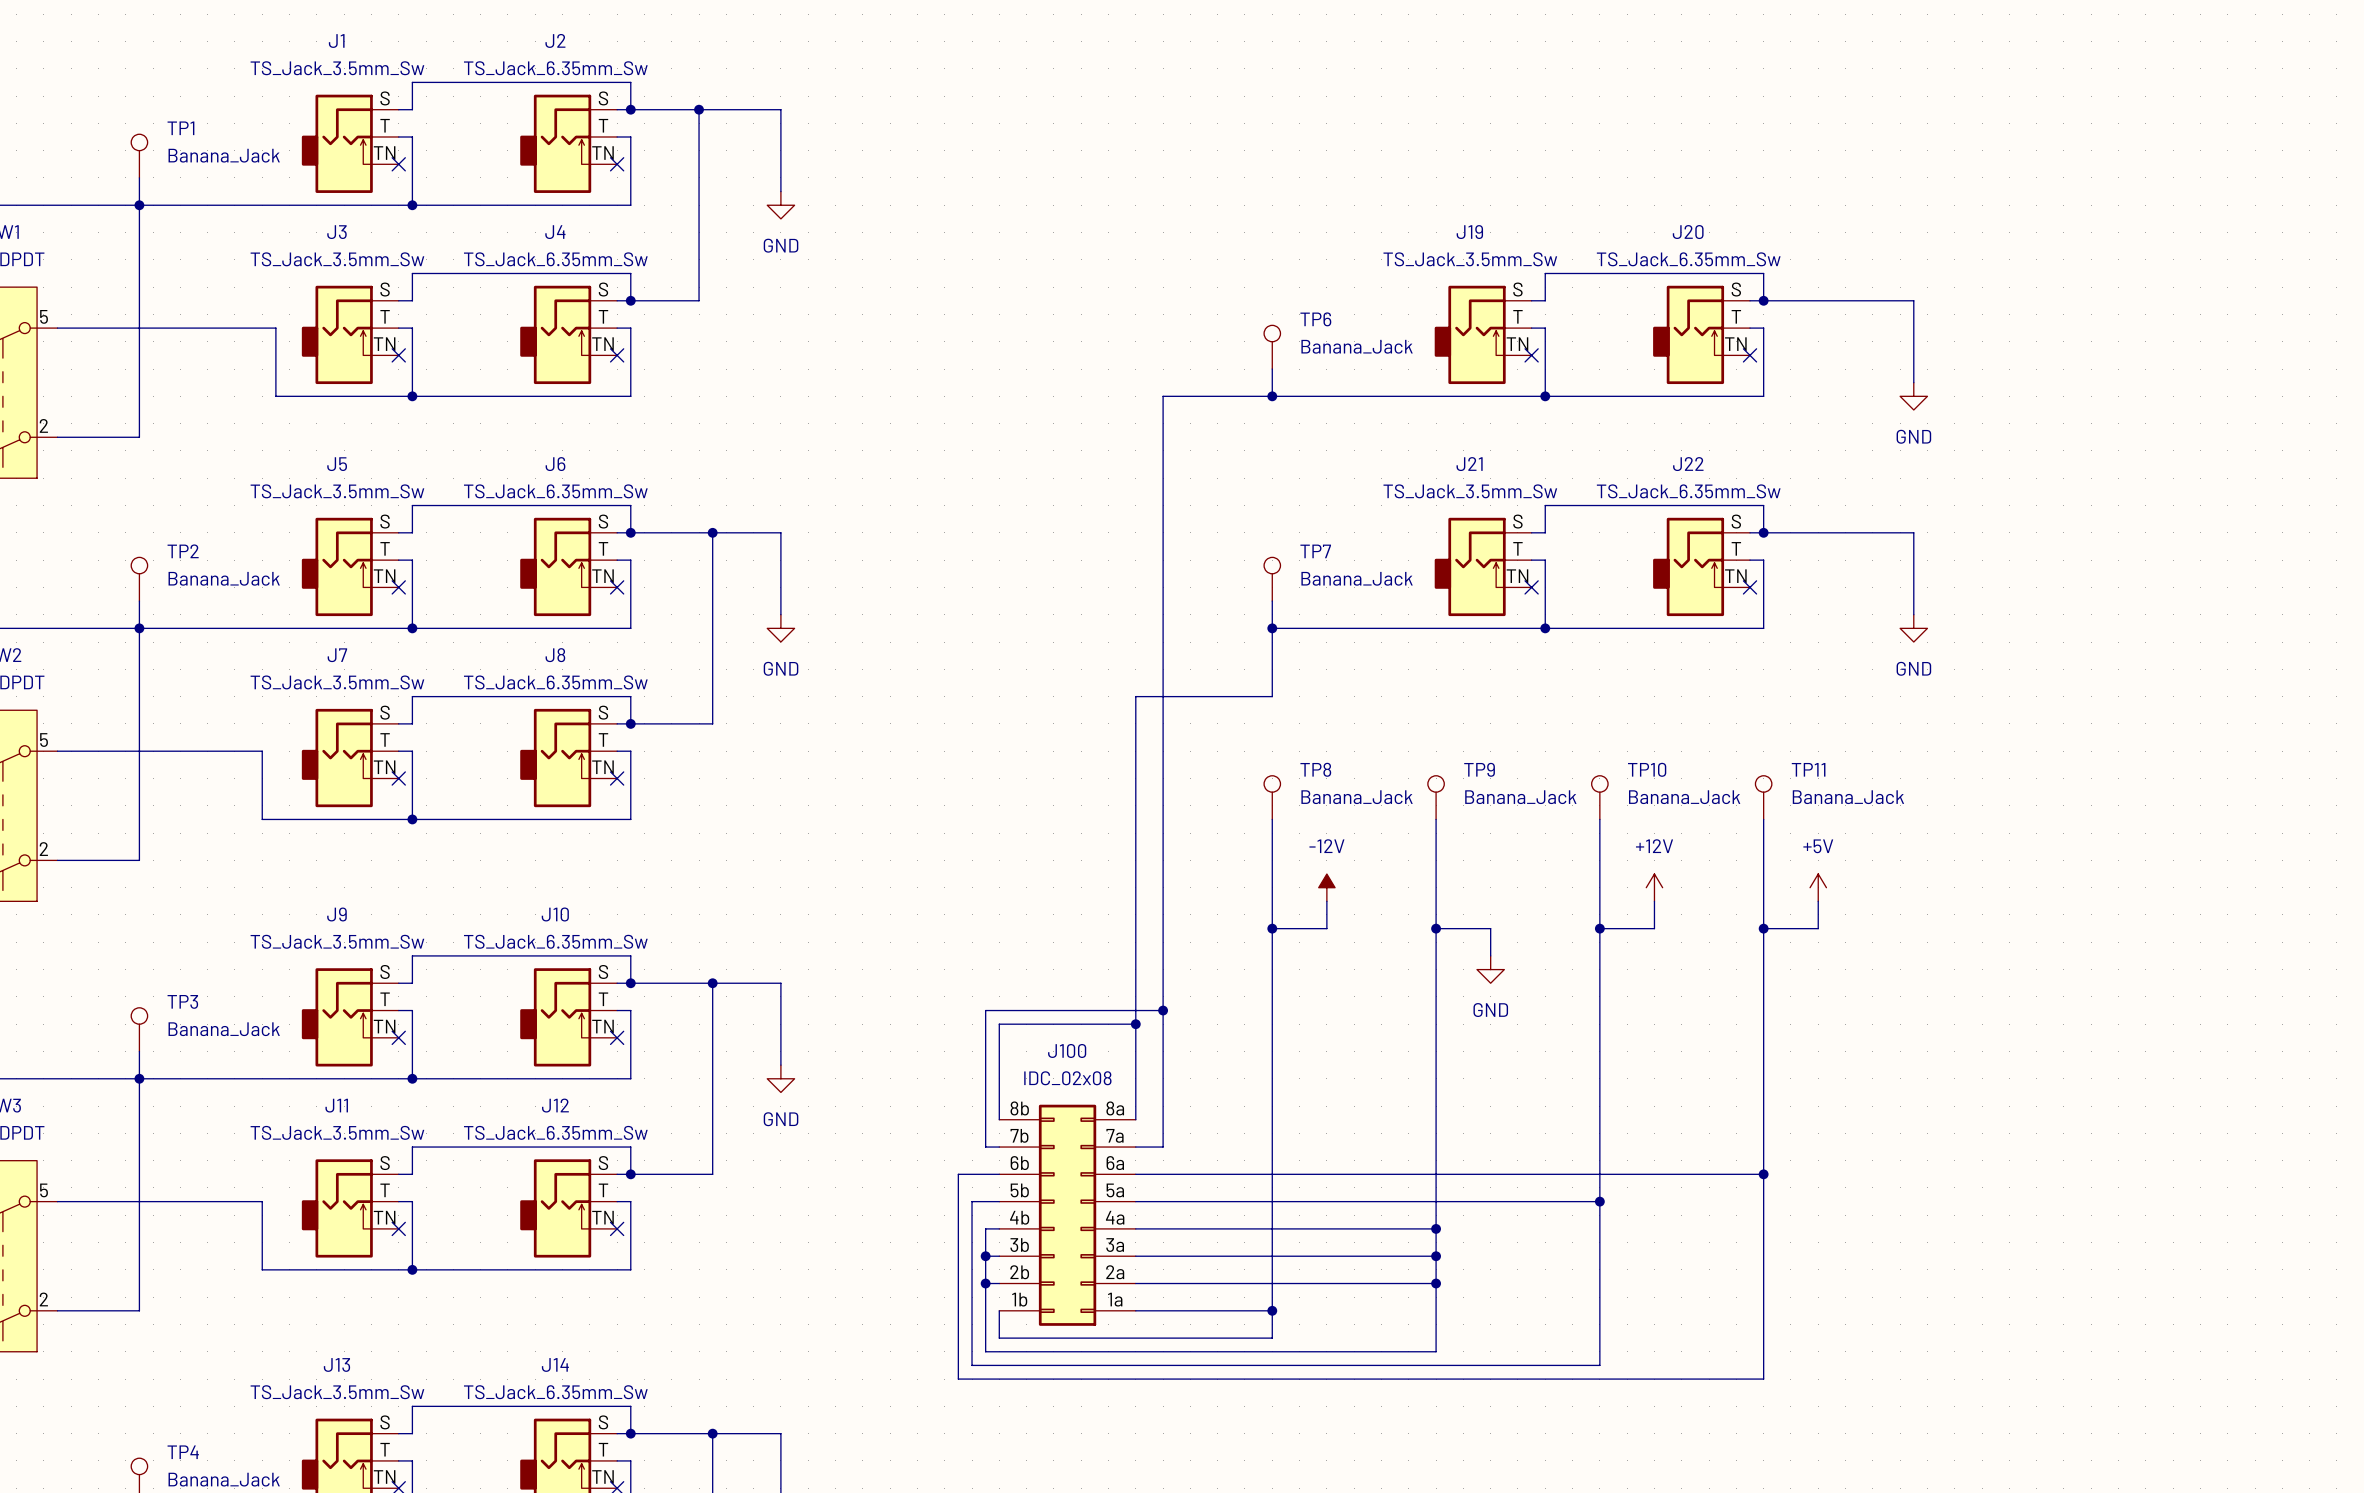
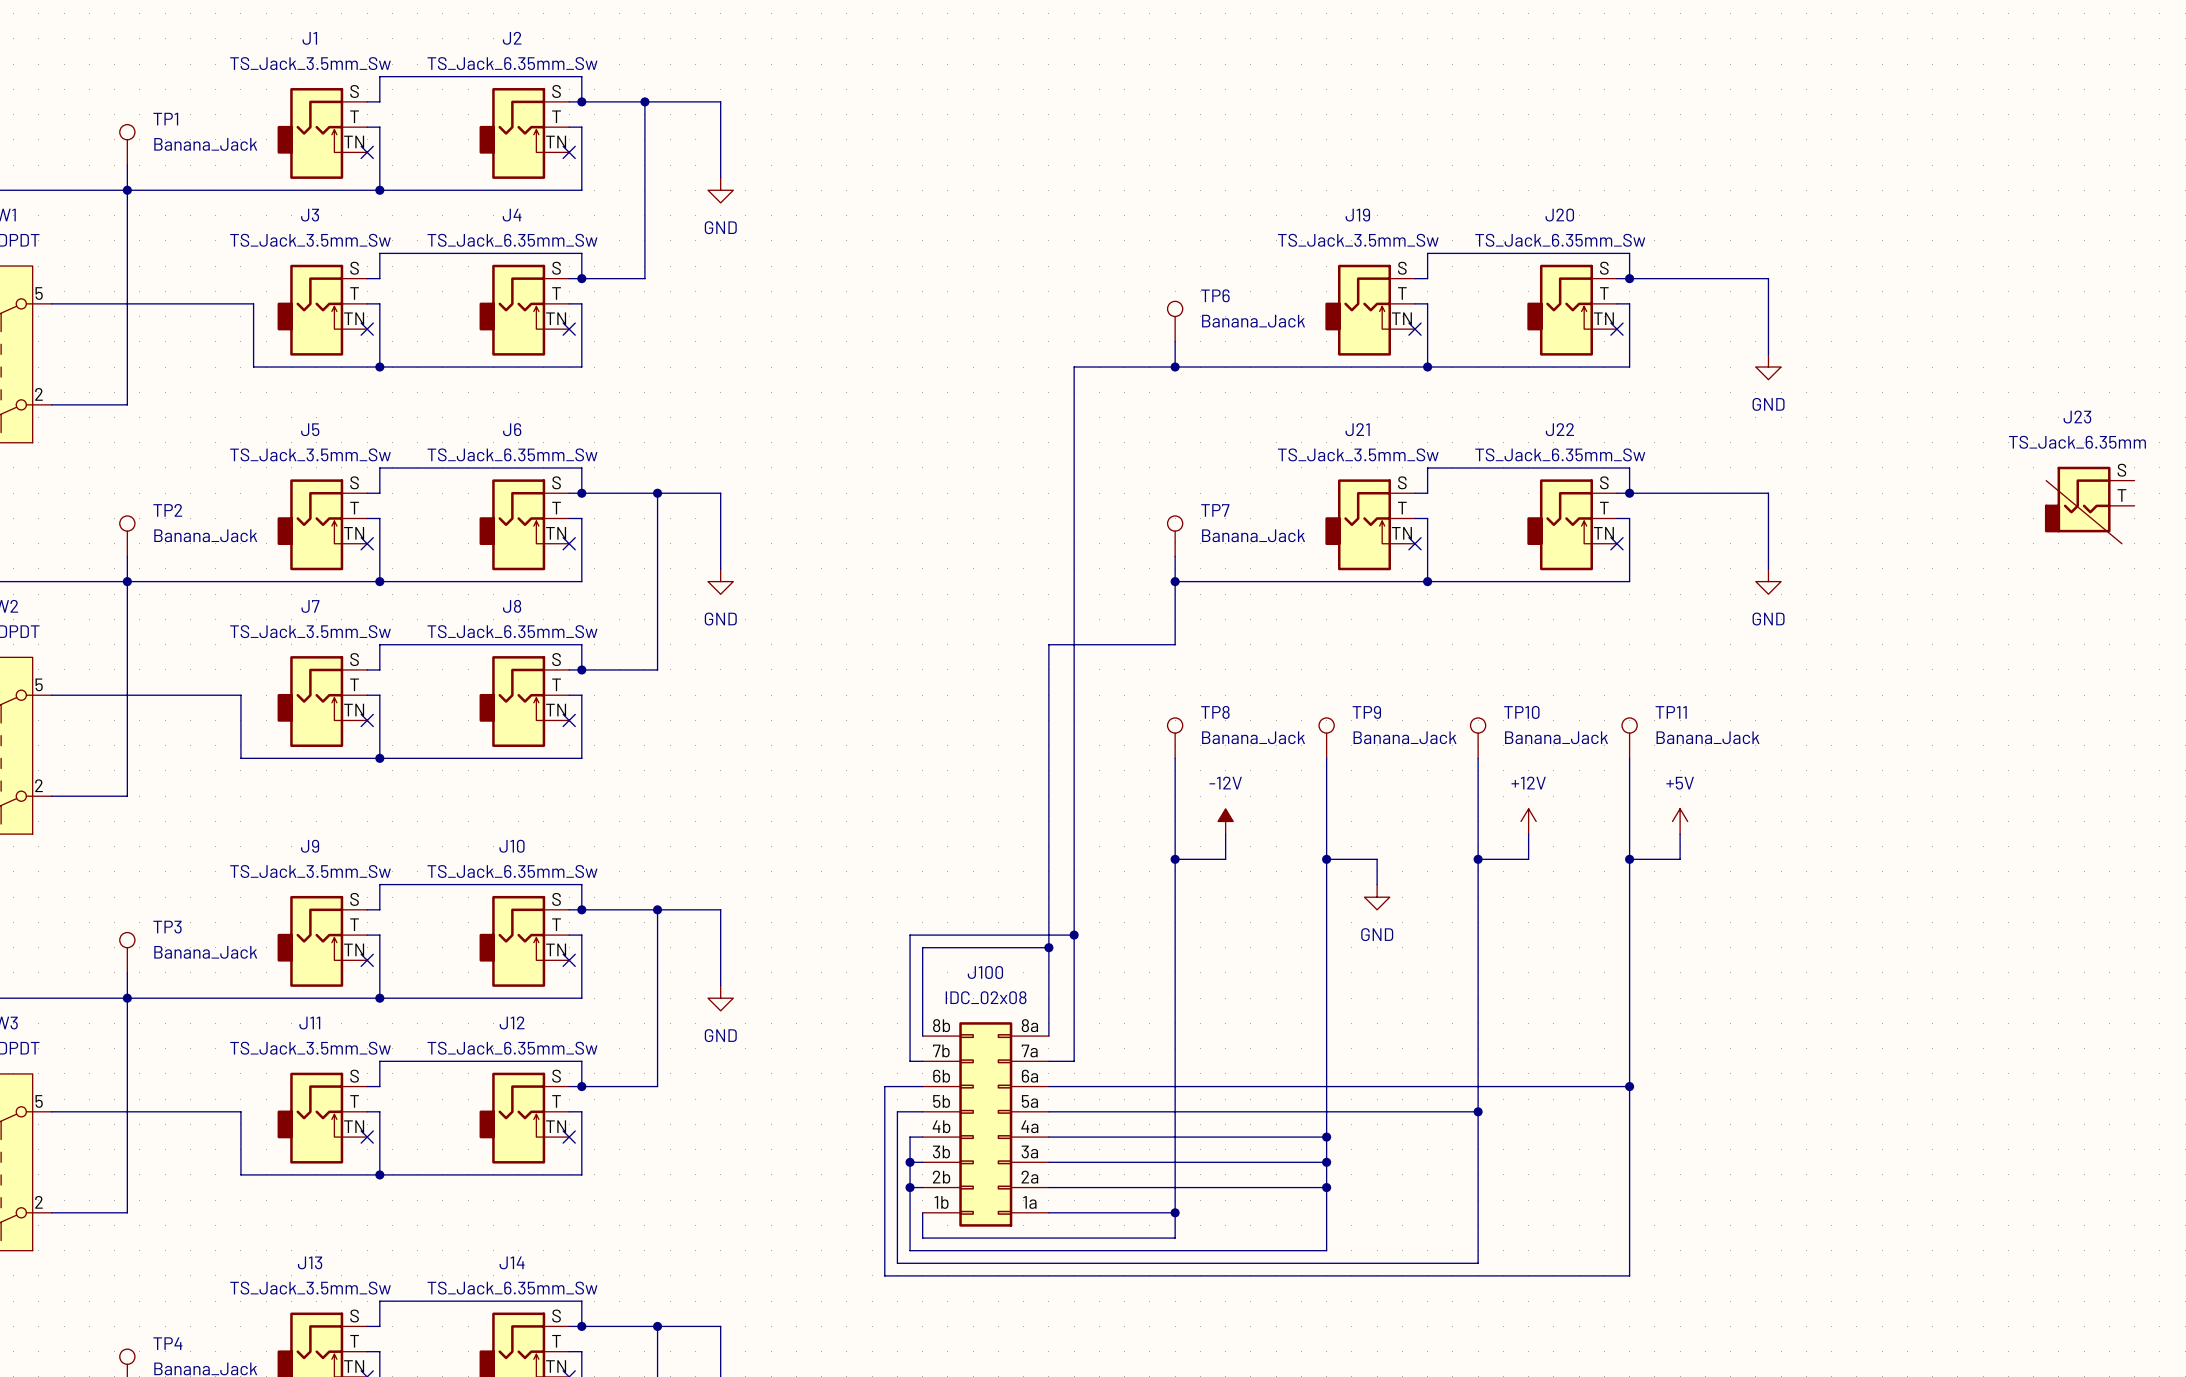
J23: none -> TS_Jack_6.35mm (2089, 505)

